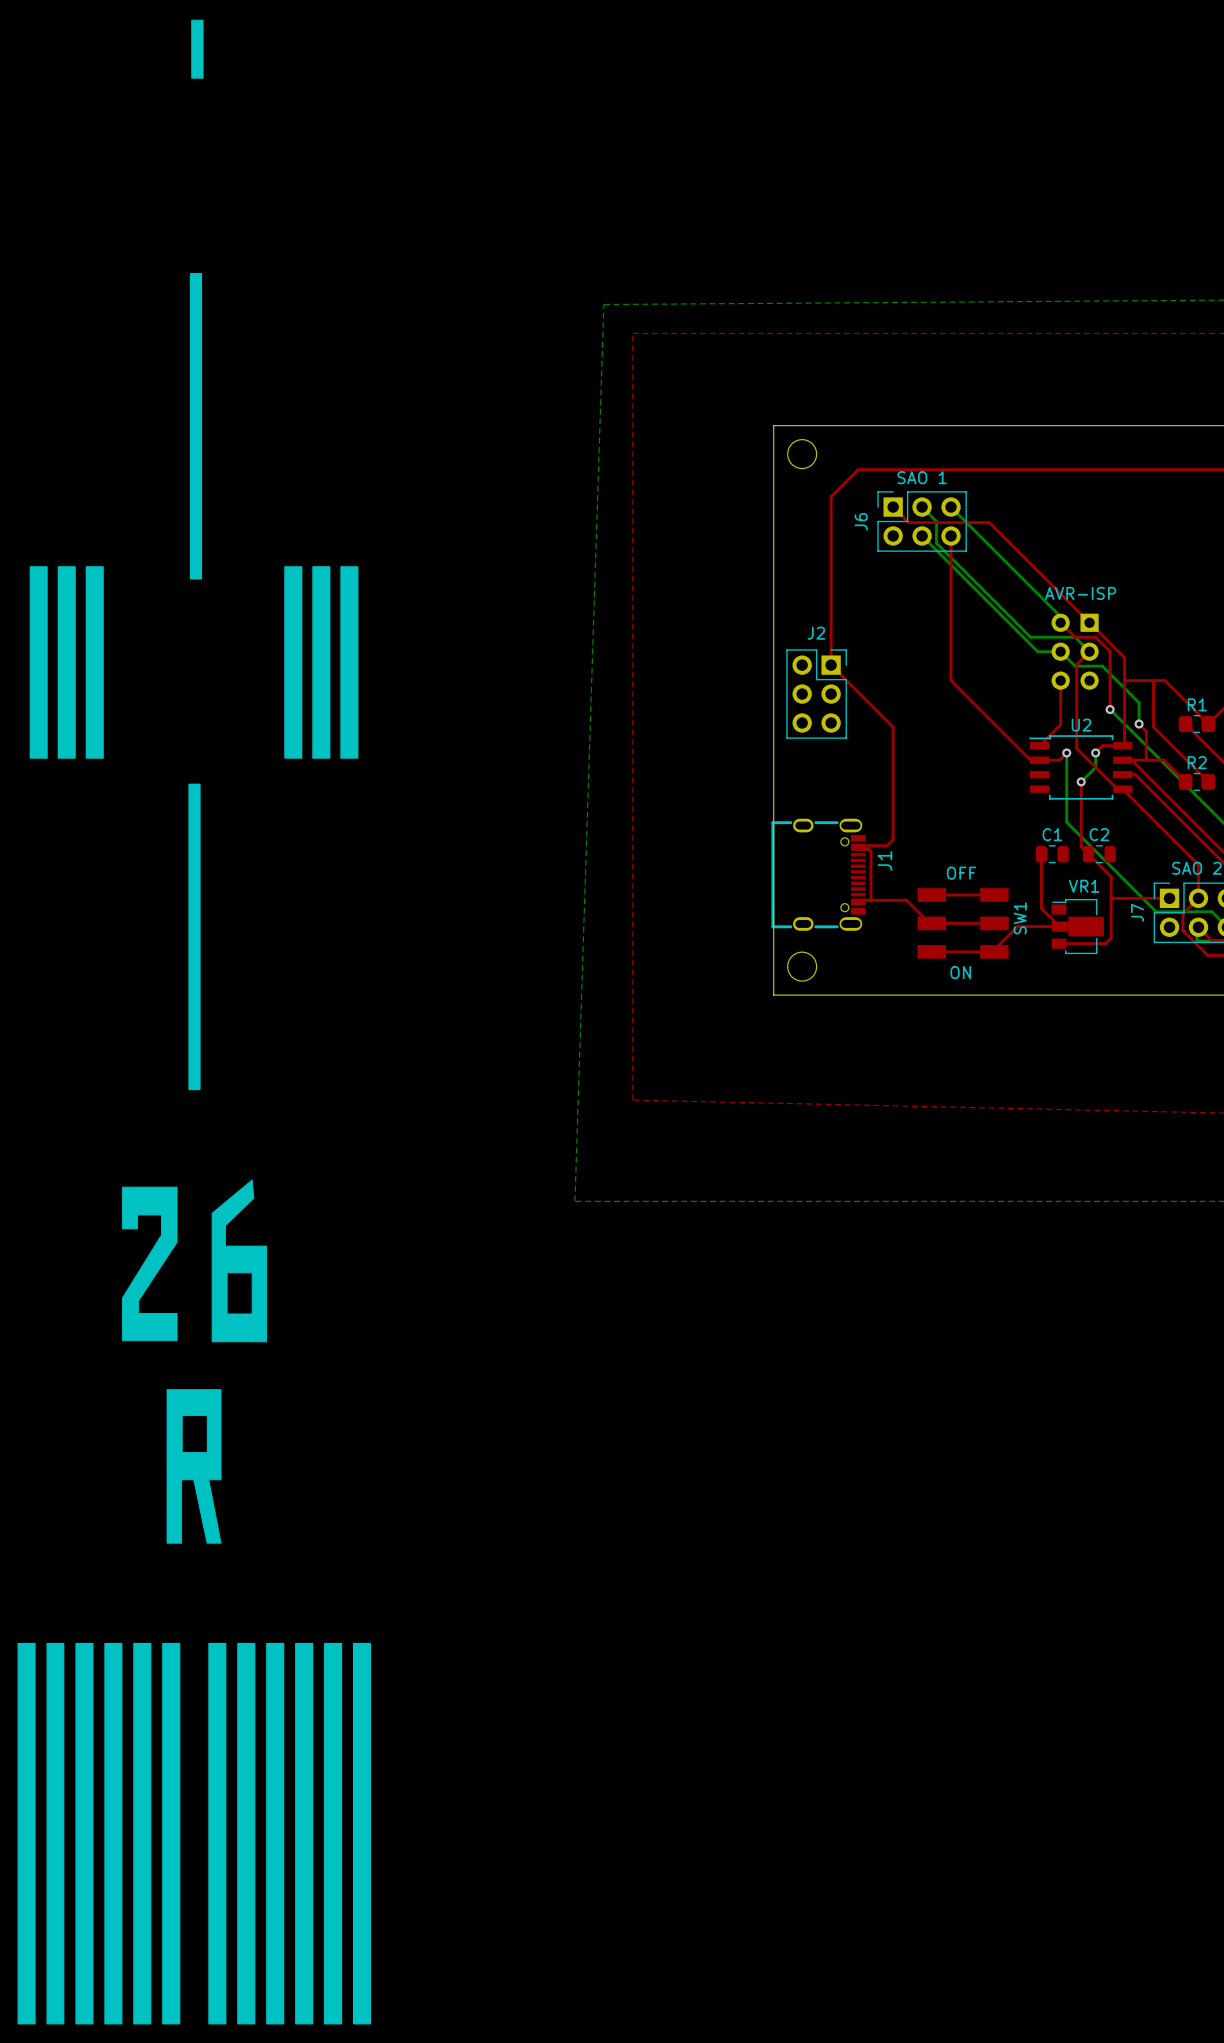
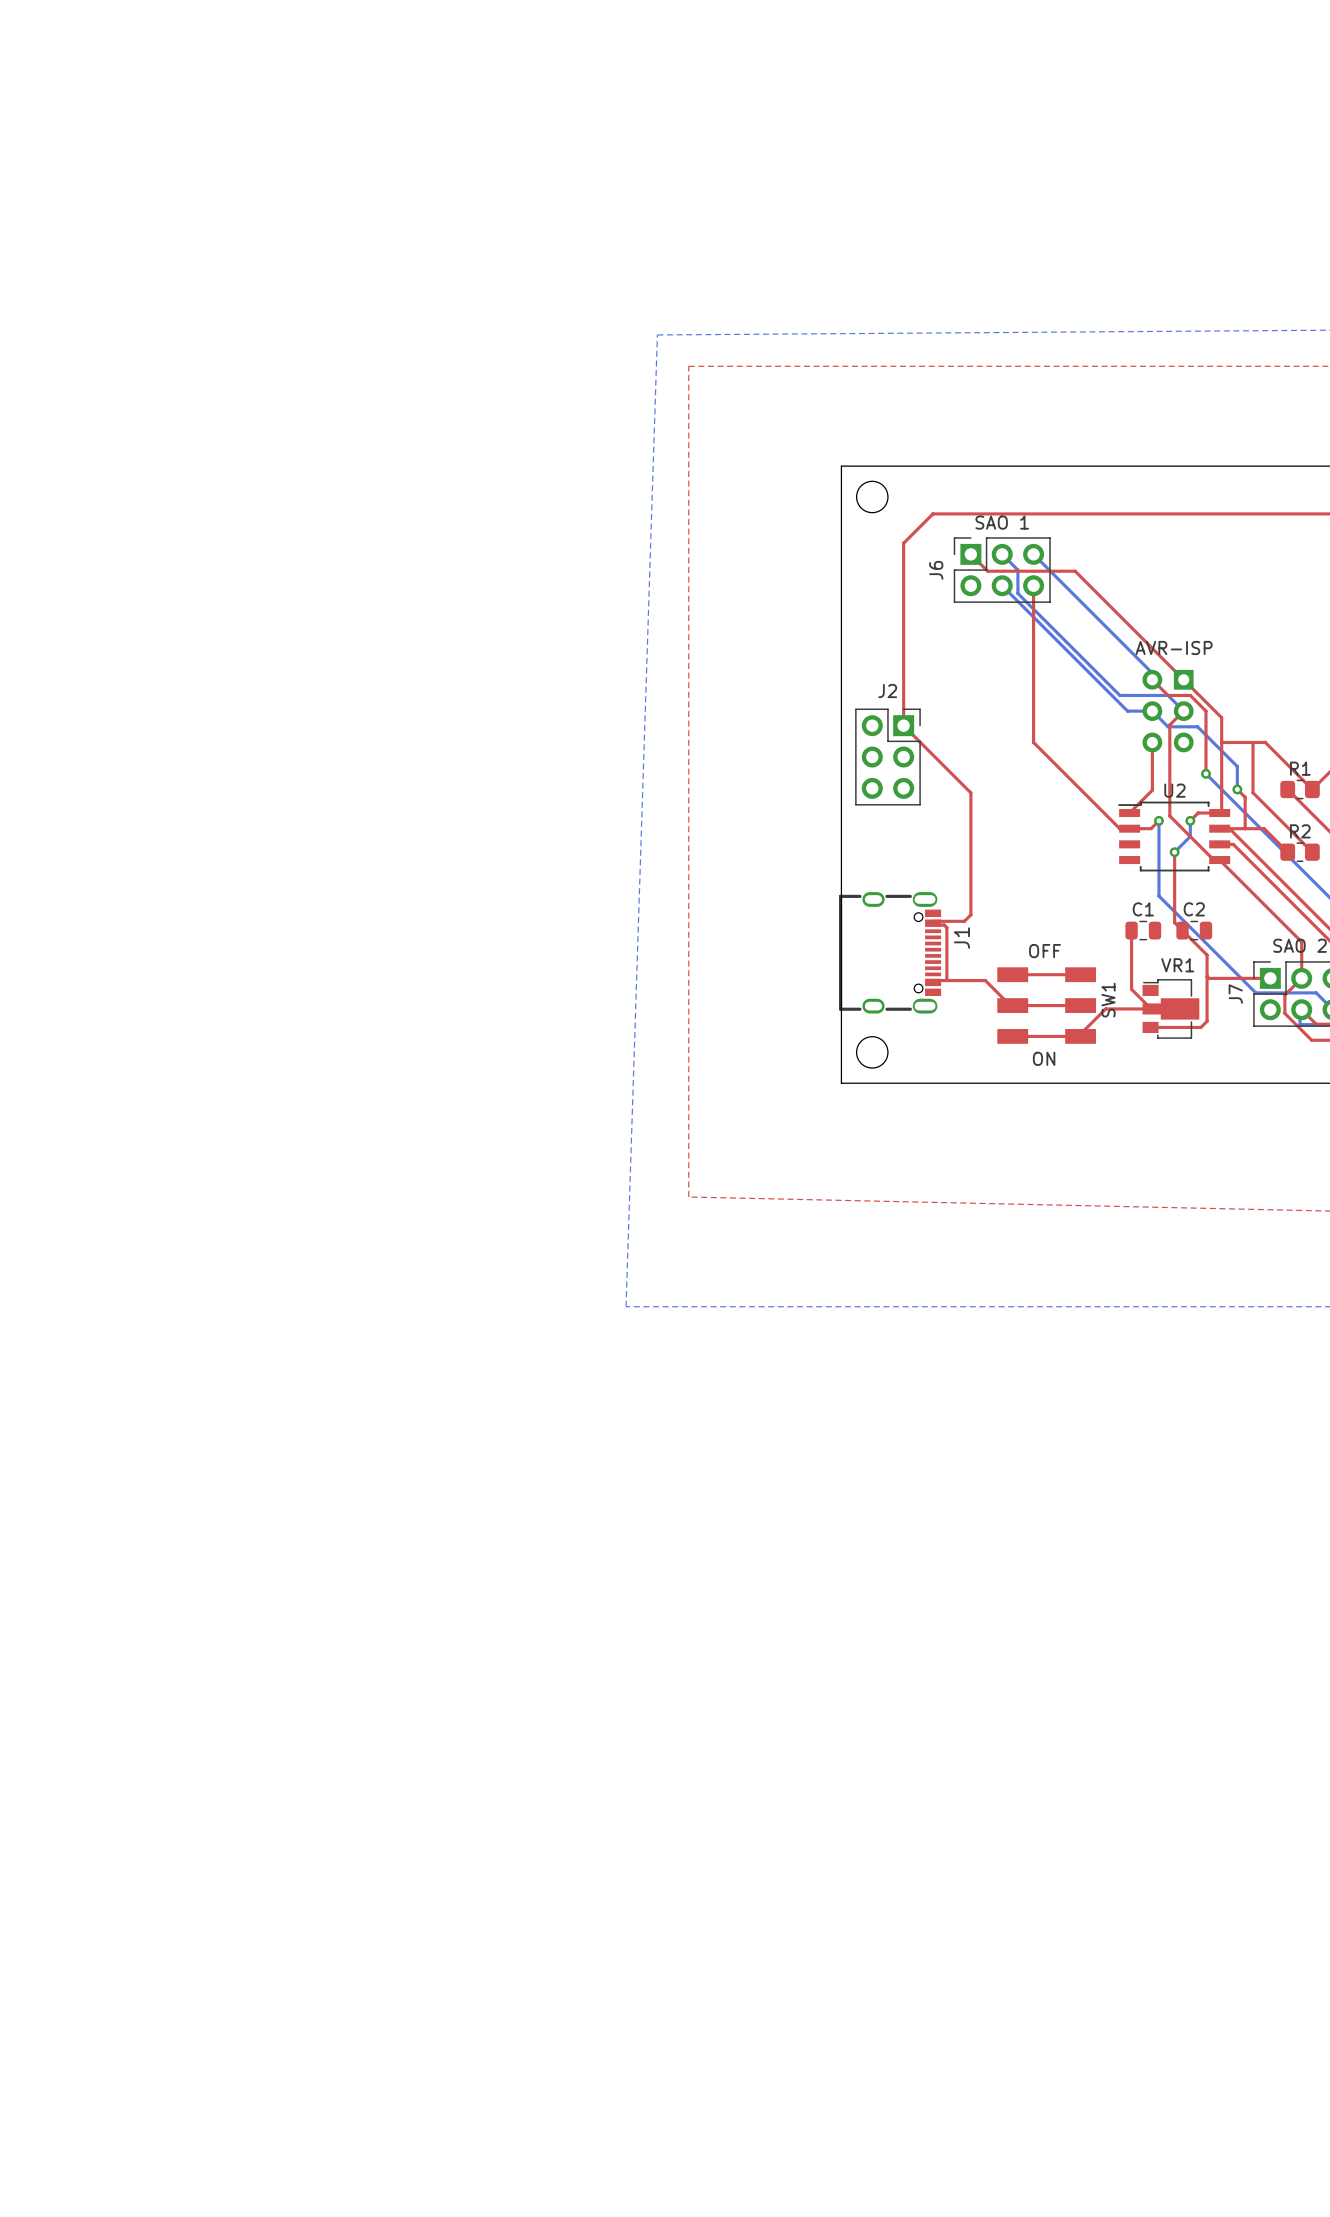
drawing: [17, 19, 372, 2025] -> none

